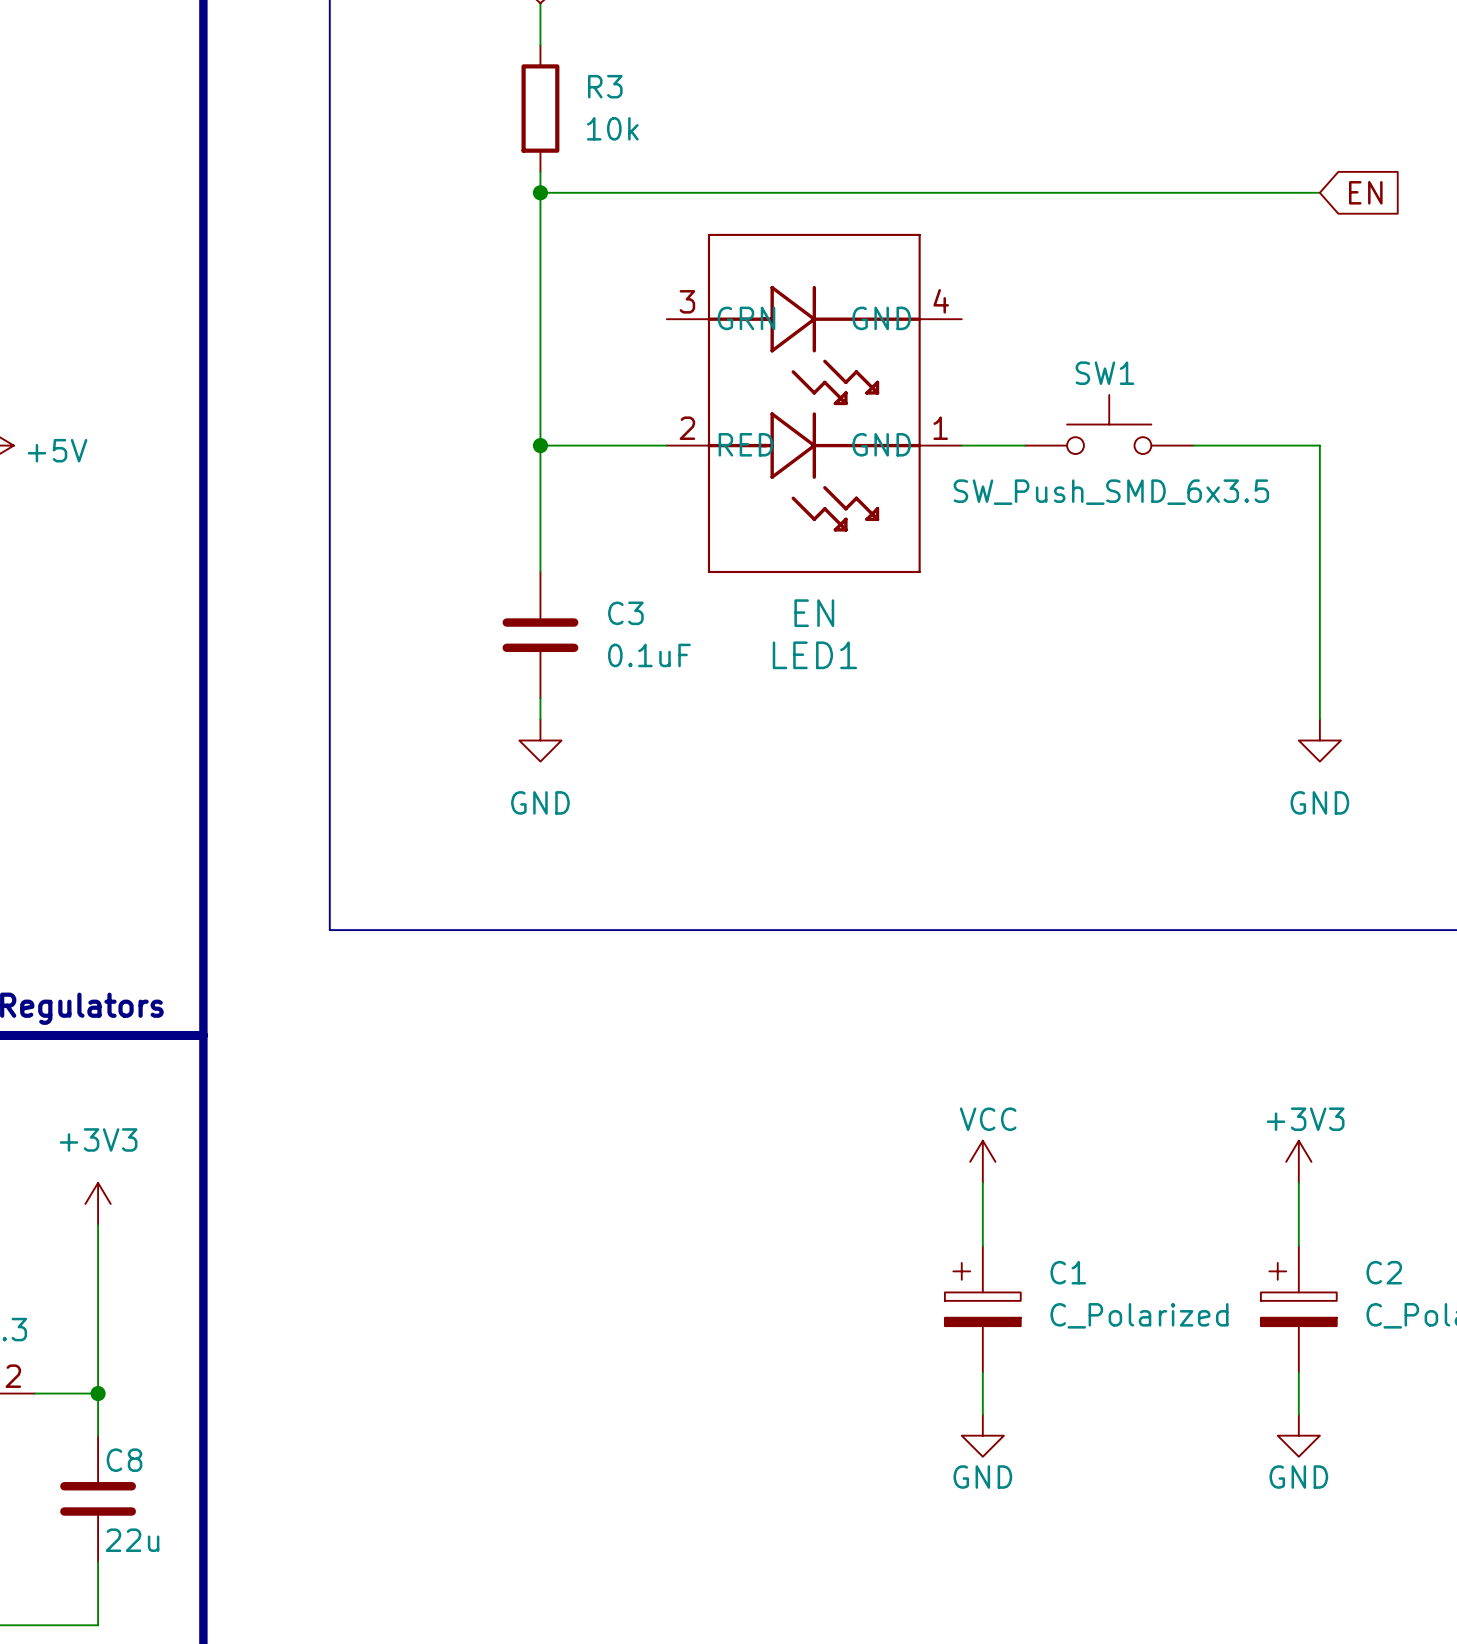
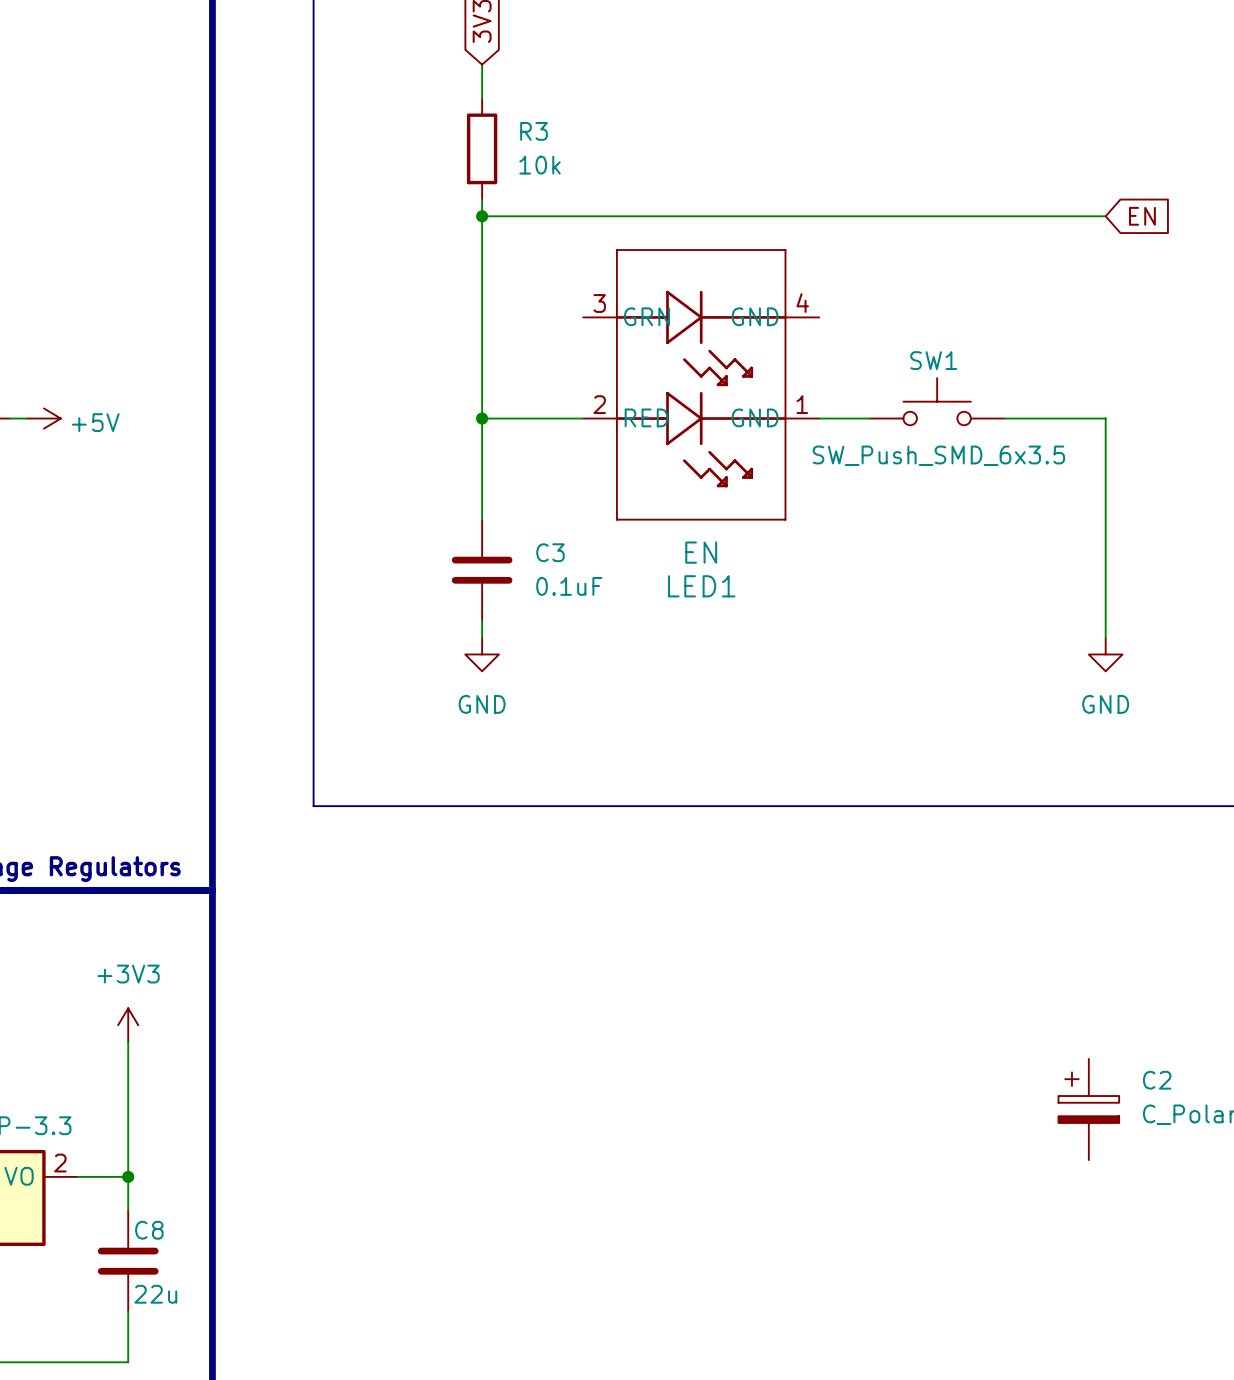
power symbol: VCC (982, 1161) -> none
power symbol: +3V3 (1298, 1161) -> none
wire: (982, 1182) (982, 1246) -> none
wire: (1298, 1182) (1298, 1246) -> none
C1: C_Polarized (982, 1309) -> none
wire: (982, 1372) (982, 1414) -> none
wire: (1298, 1372) (1298, 1414) -> none
power symbol: GND (982, 1435) -> none
power symbol: GND (1298, 1435) -> none

